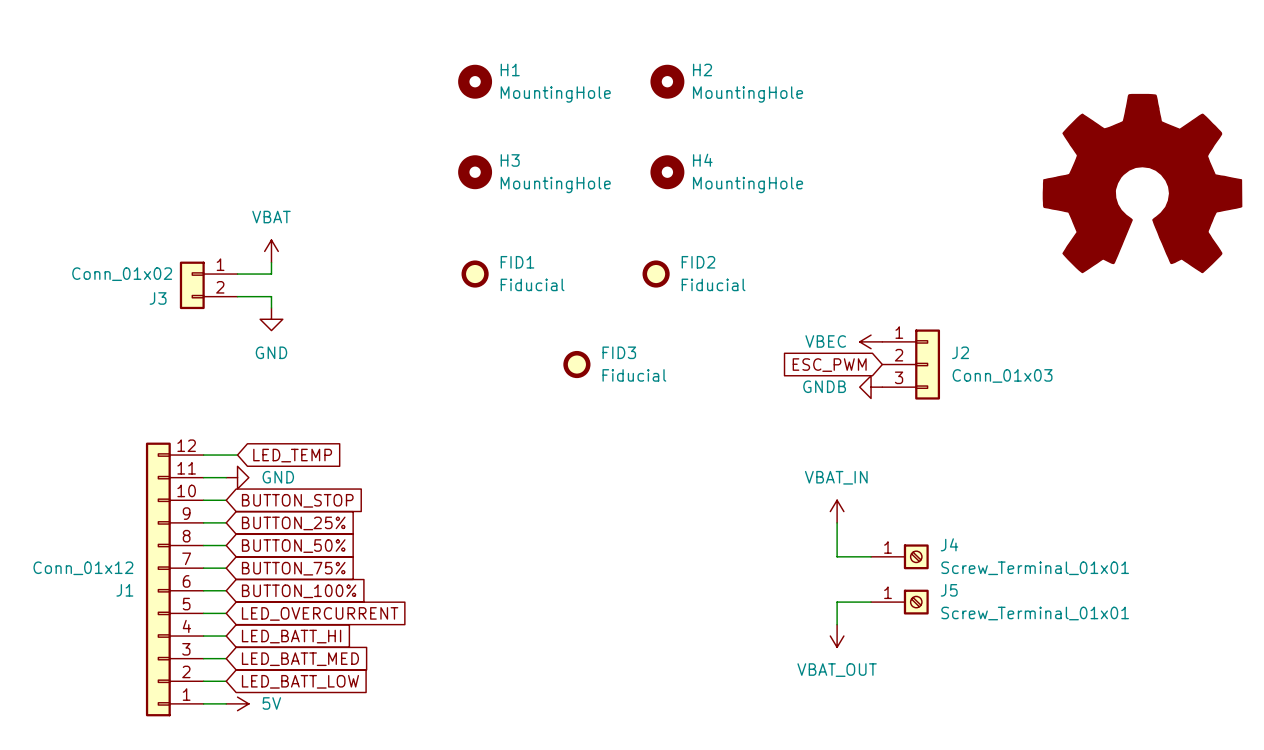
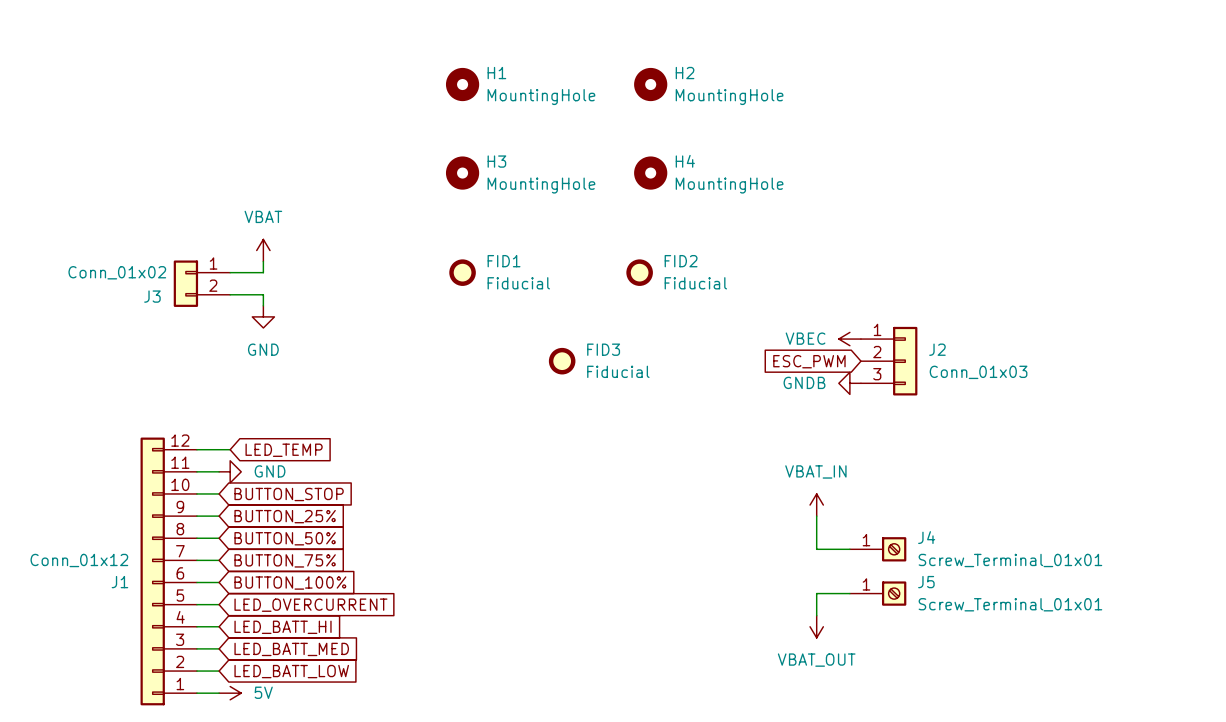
power symbol: (1142, 183) -> none

